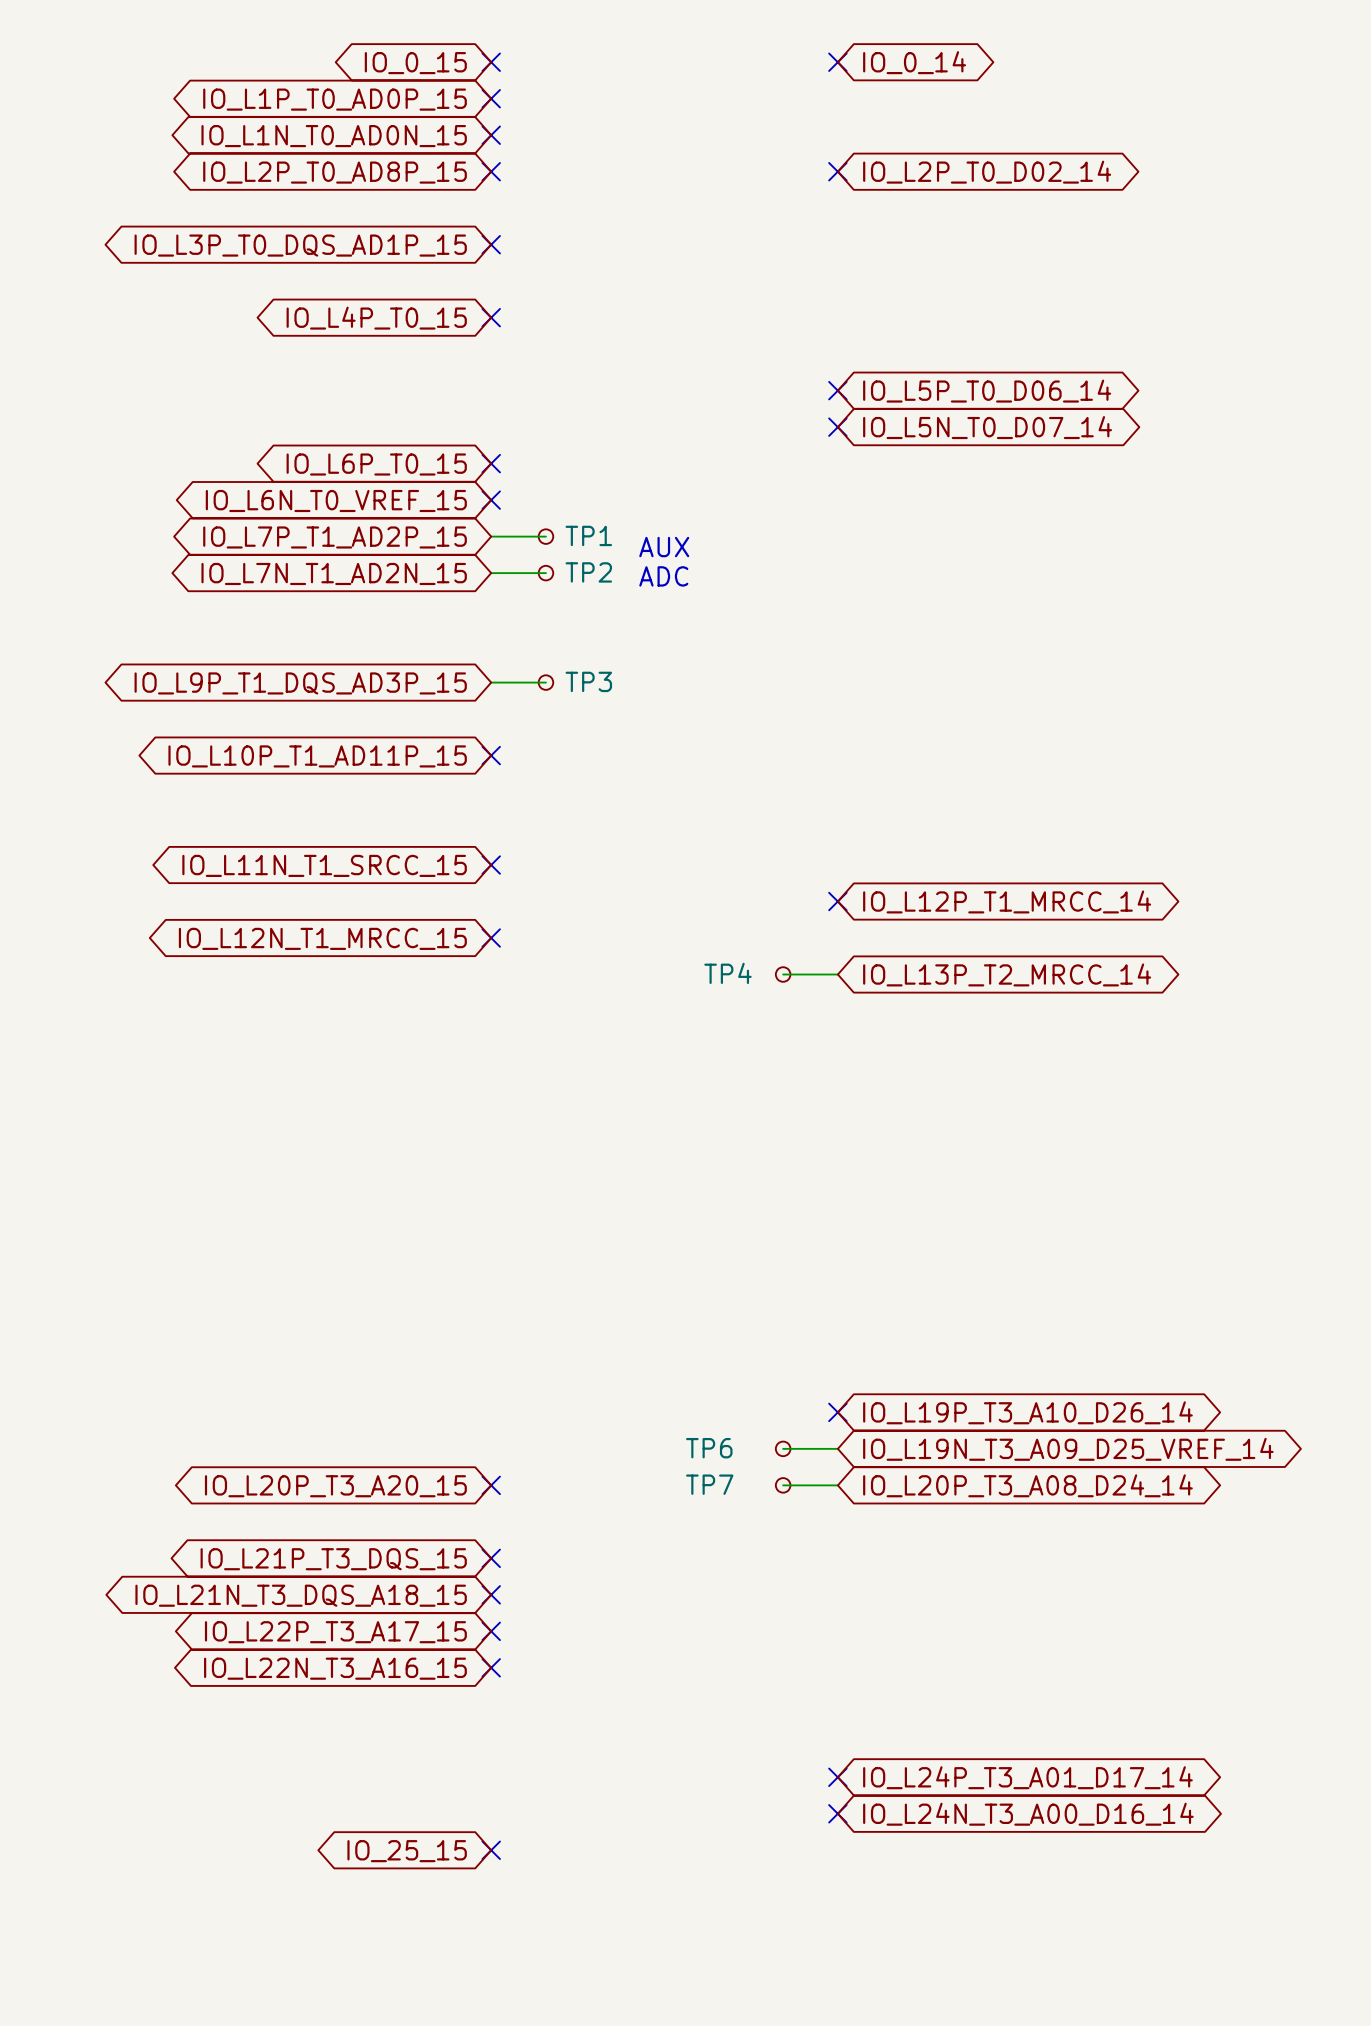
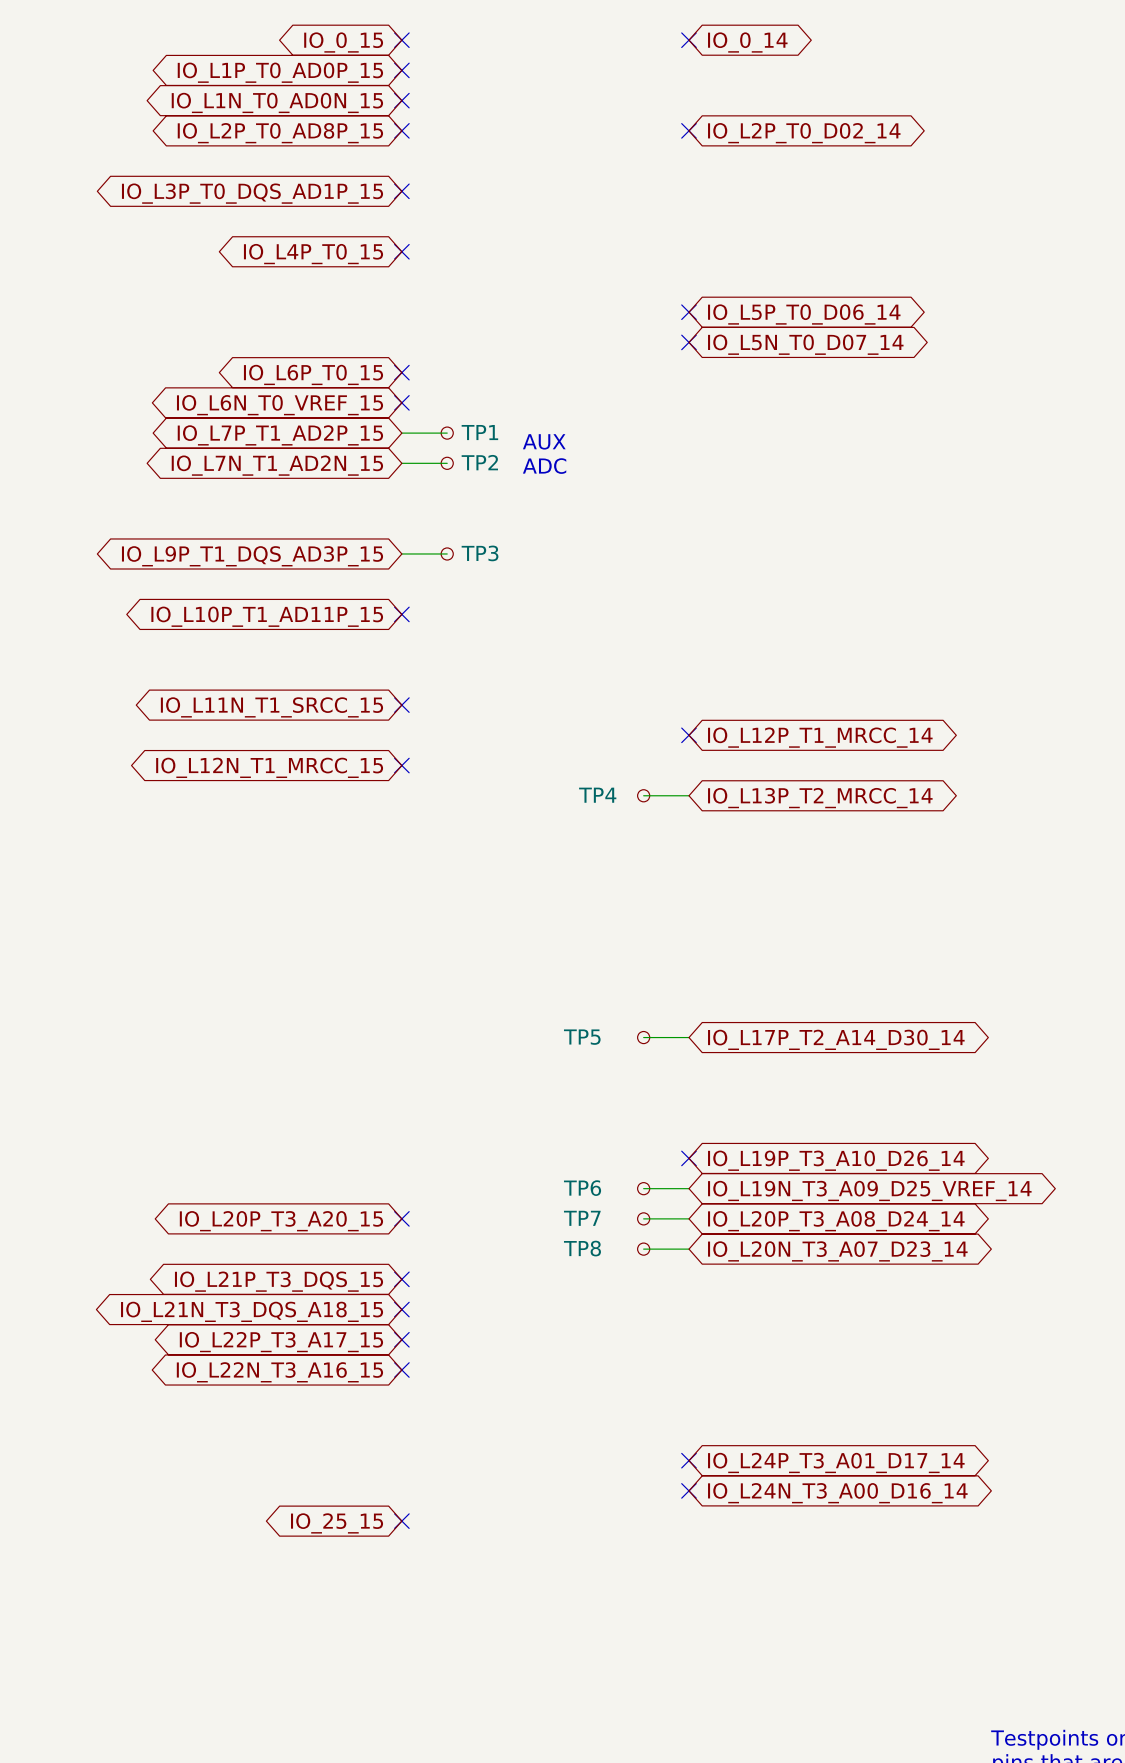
wire: none -> (643, 1037) (688, 1037)
TP5: none -> (643, 1037)
global label: none -> IO_L17P_T2_A14_D30_14 (836, 1039)
wire: none -> (643, 1249) (688, 1249)
TP8: none -> (643, 1249)
global label: none -> IO_L20N_T3_A07_D23_14 (837, 1251)

